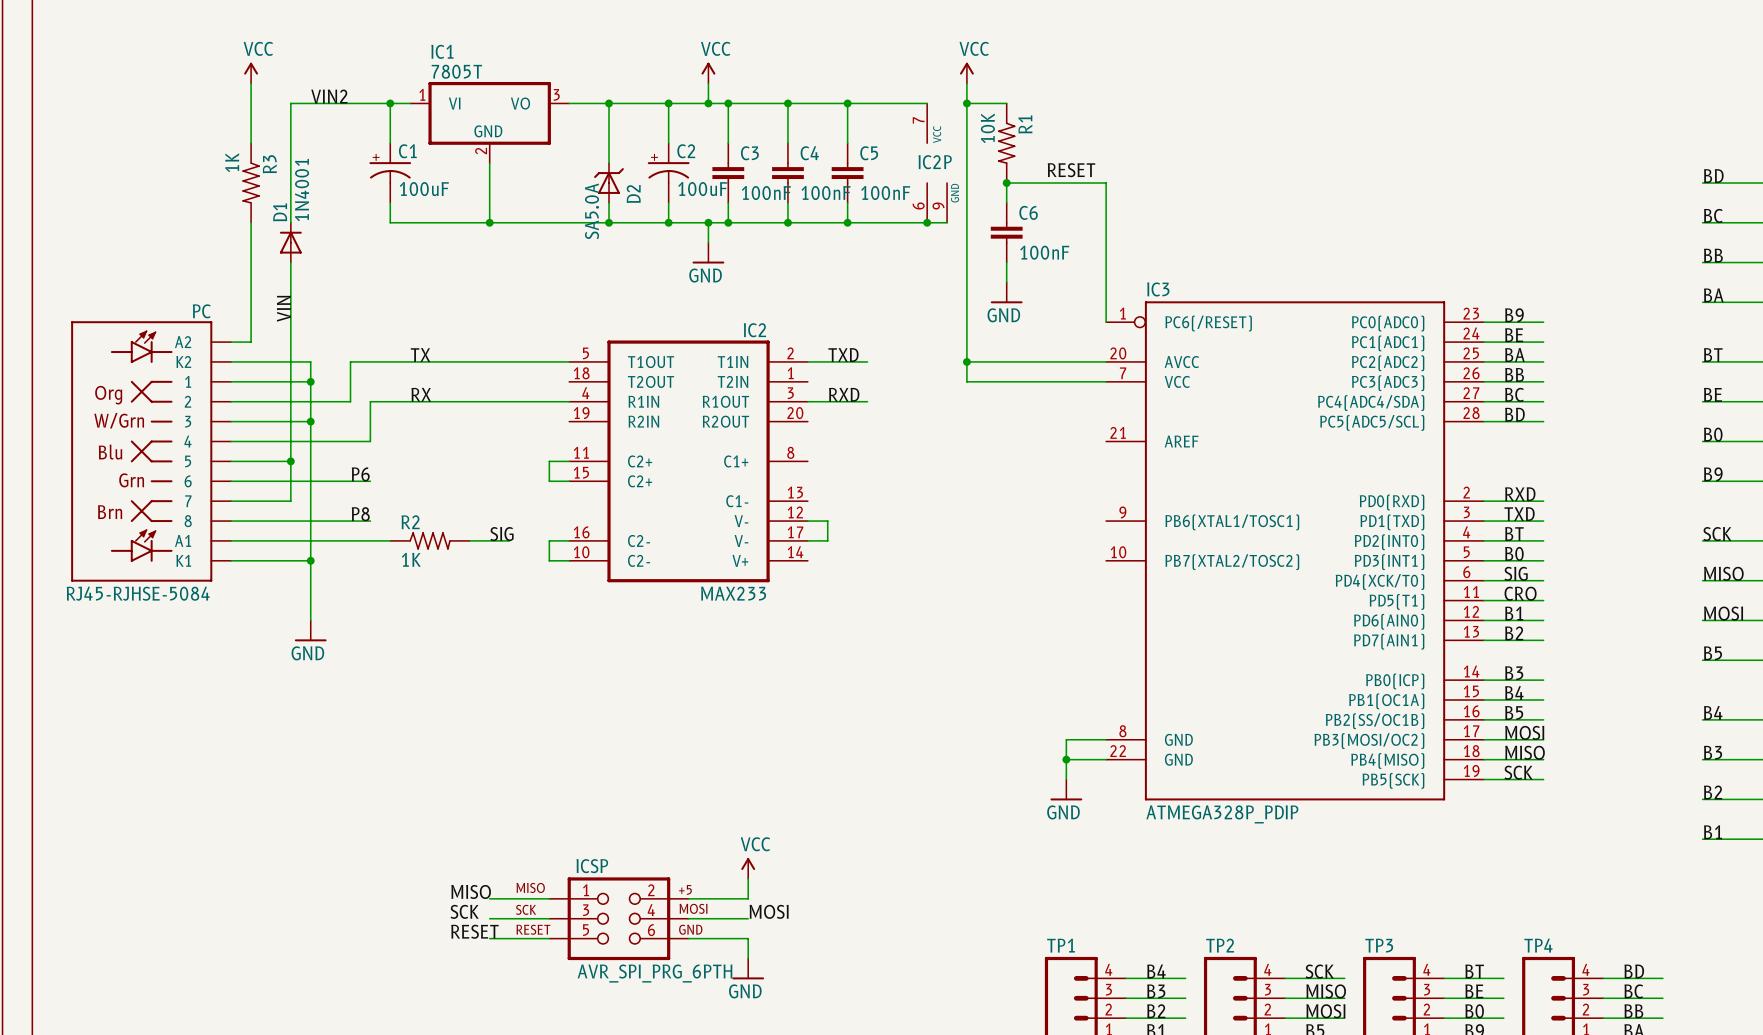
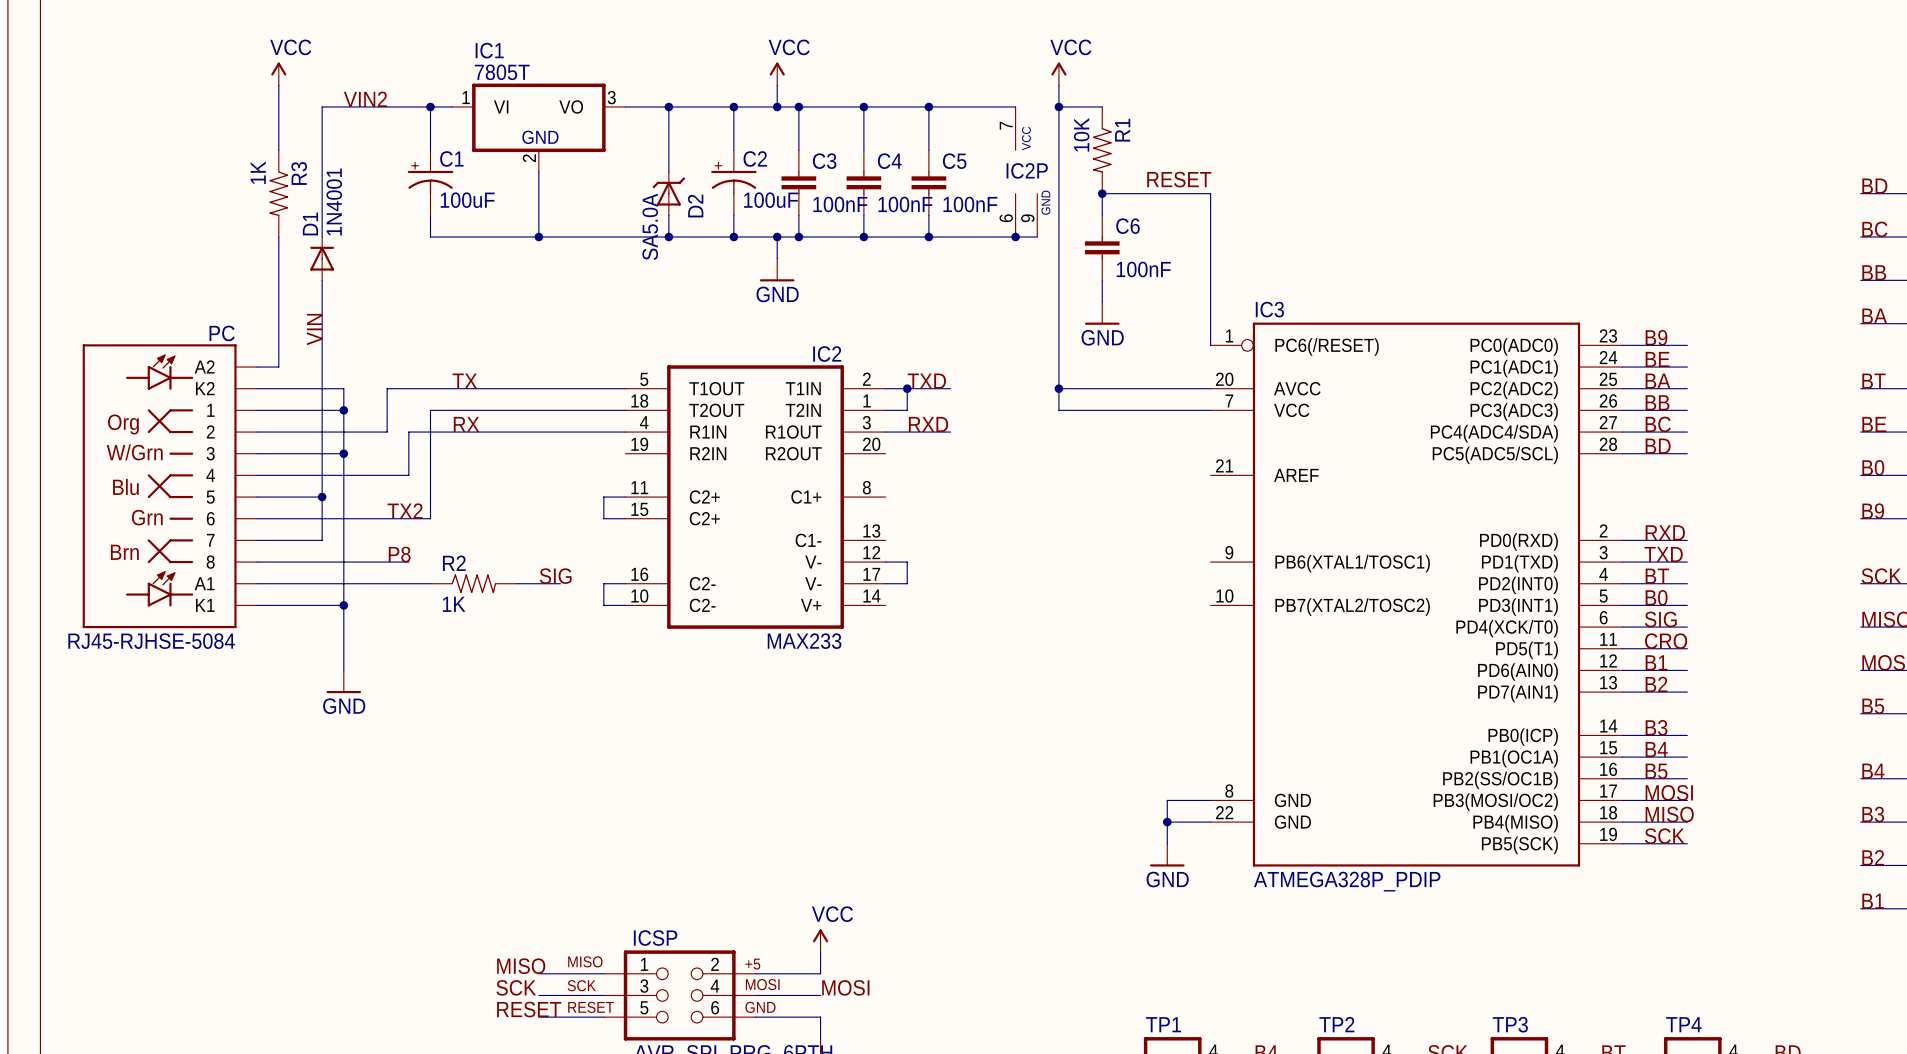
wire: none -> (907, 388) (907, 410) (885, 410)
junction: none -> (907, 388)
wire: none -> (625, 410) (430, 410) (430, 518) (408, 518)
label: P6 (360, 474) -> TX2 (405, 511)

